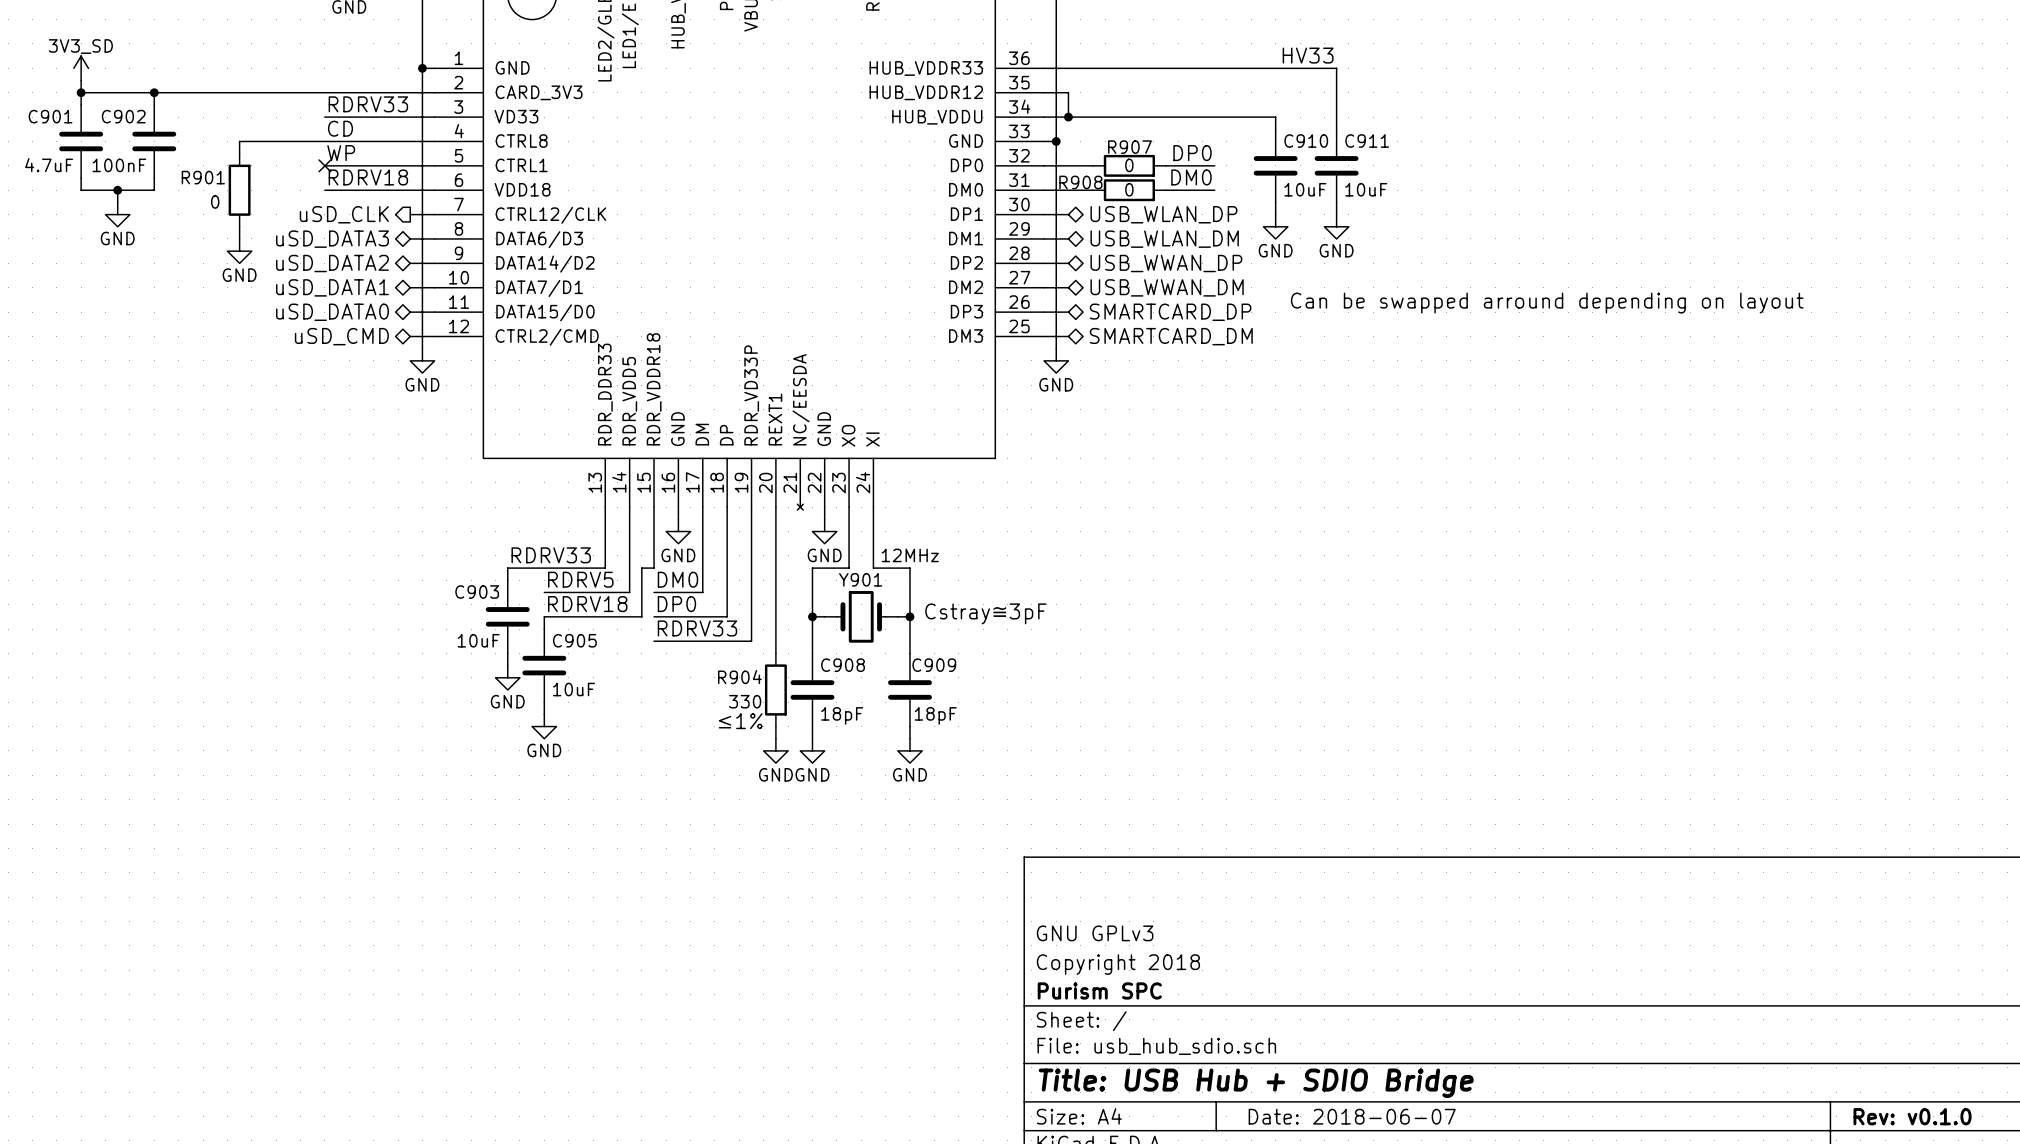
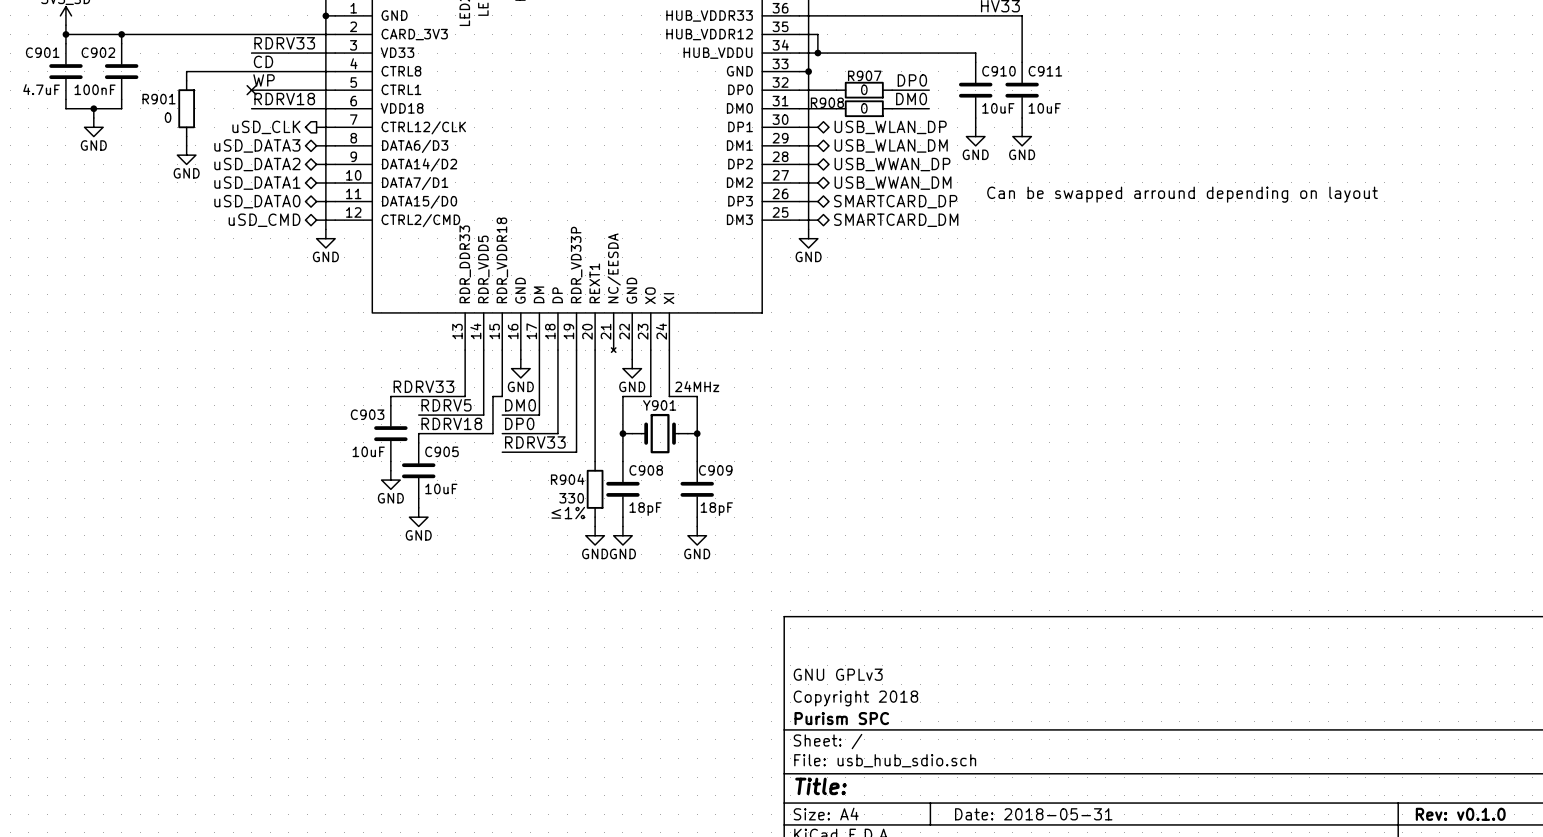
Y901 value: 12MHz (910, 555) -> 24MHz (697, 386)
text: Cstray≅3pF (985, 613) -> none
title block: Title: USB Hub + SDIO Bridge (1256, 1083) -> Title: (820, 786)
title block: Date: 2018-06-07 (1352, 1116) -> Date: 2018-05-31 (1033, 814)

